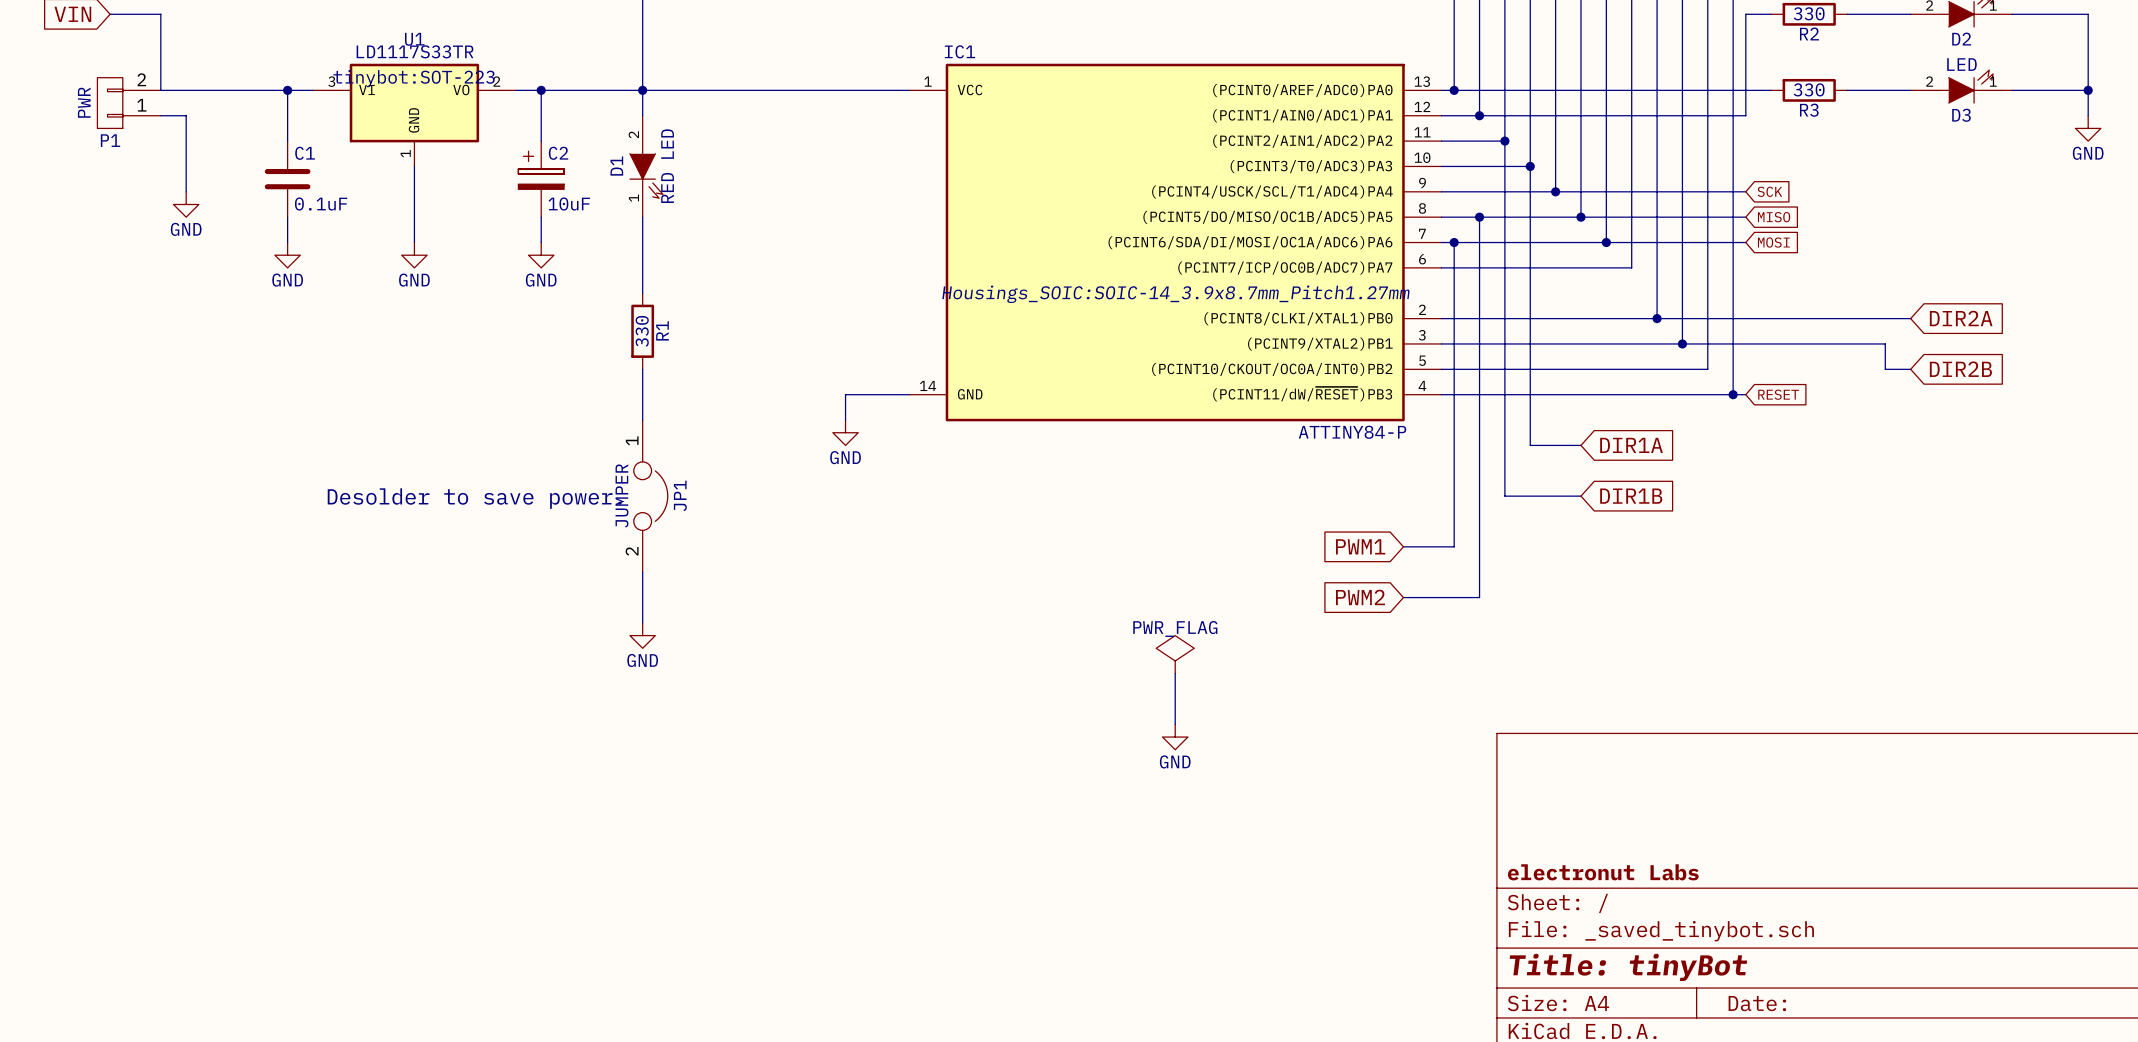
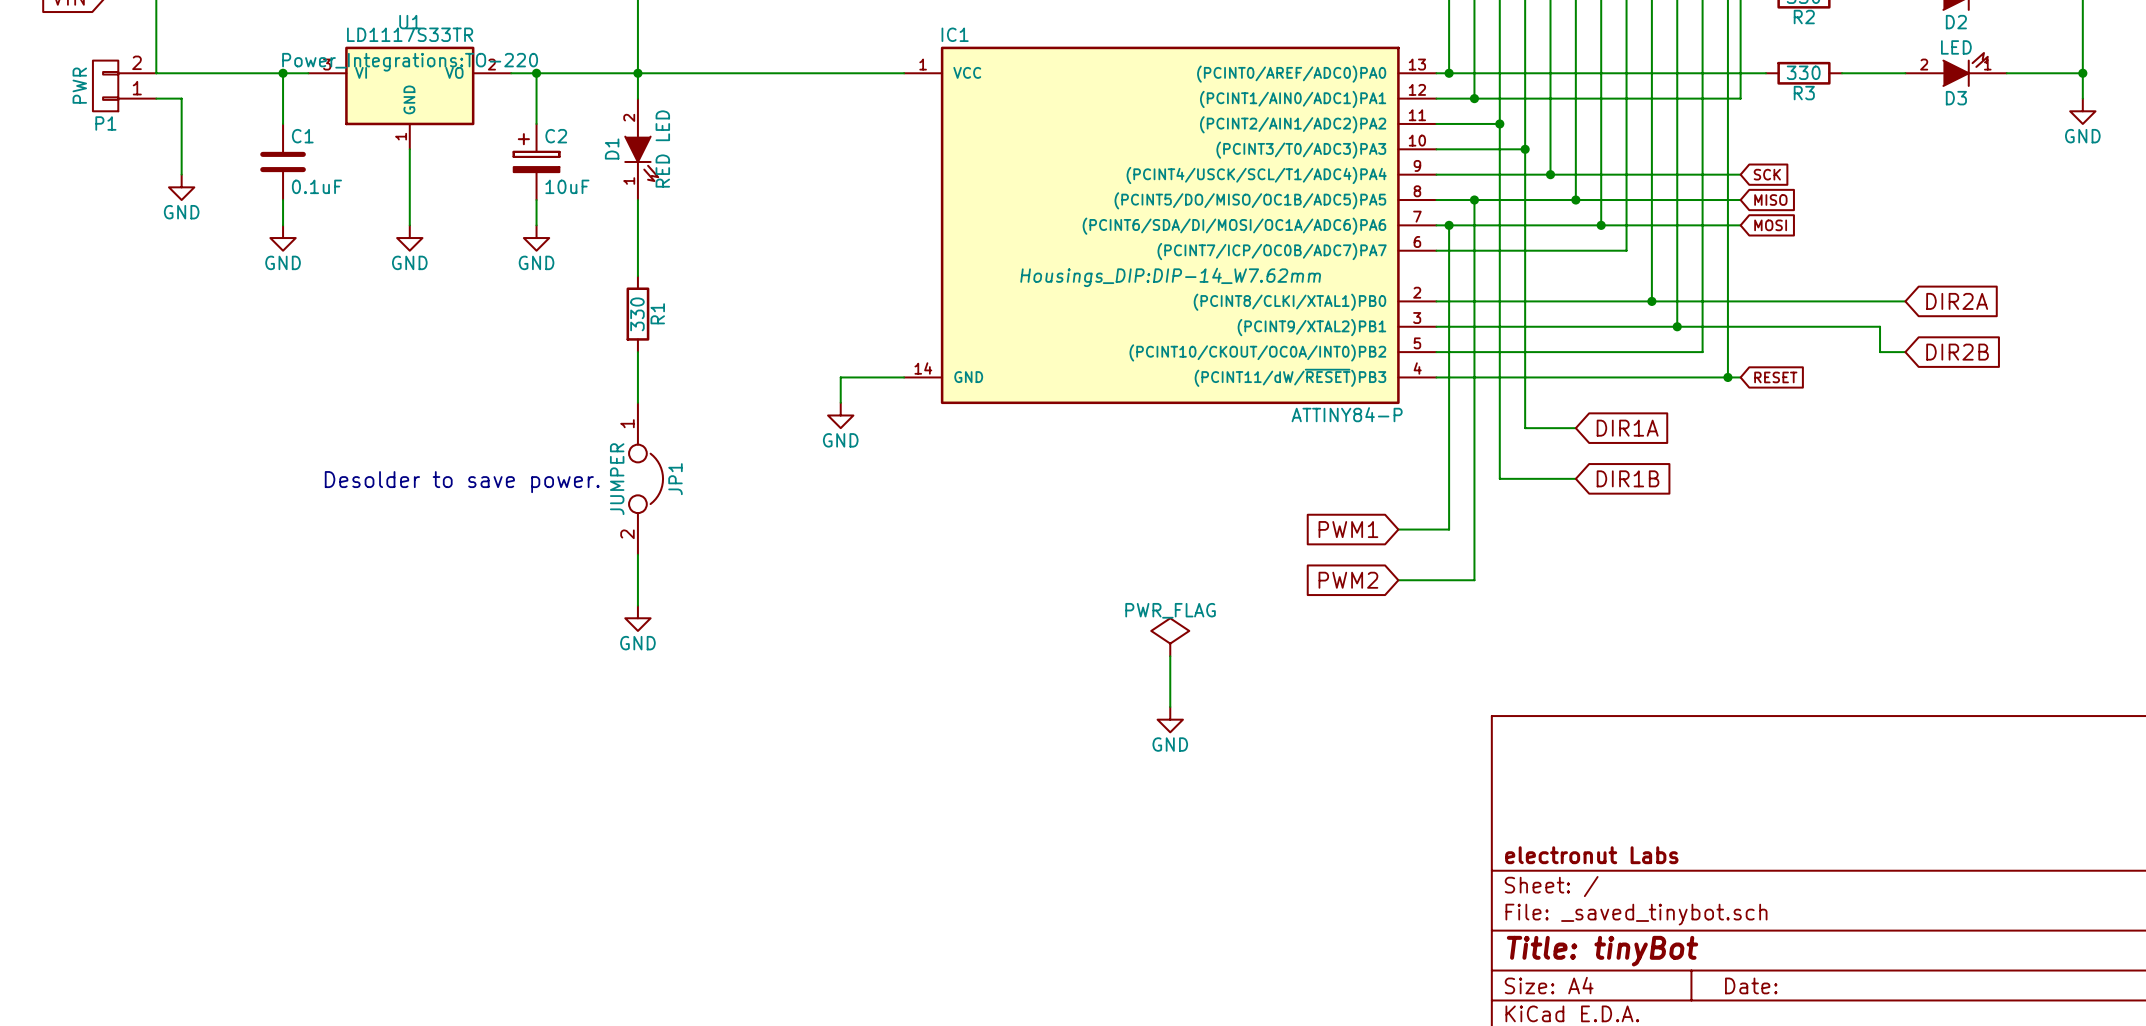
U1 text: tinybot:SOT-223 (414, 78) -> Power_Integrations:TO-220 (410, 62)
IC1 text: Housings_SOIC:SOIC-14_3.9x8.7mm_Pitch1.27mm (1175, 294) -> Housings_DIP:DIP-14_W7.62mm (1170, 277)

